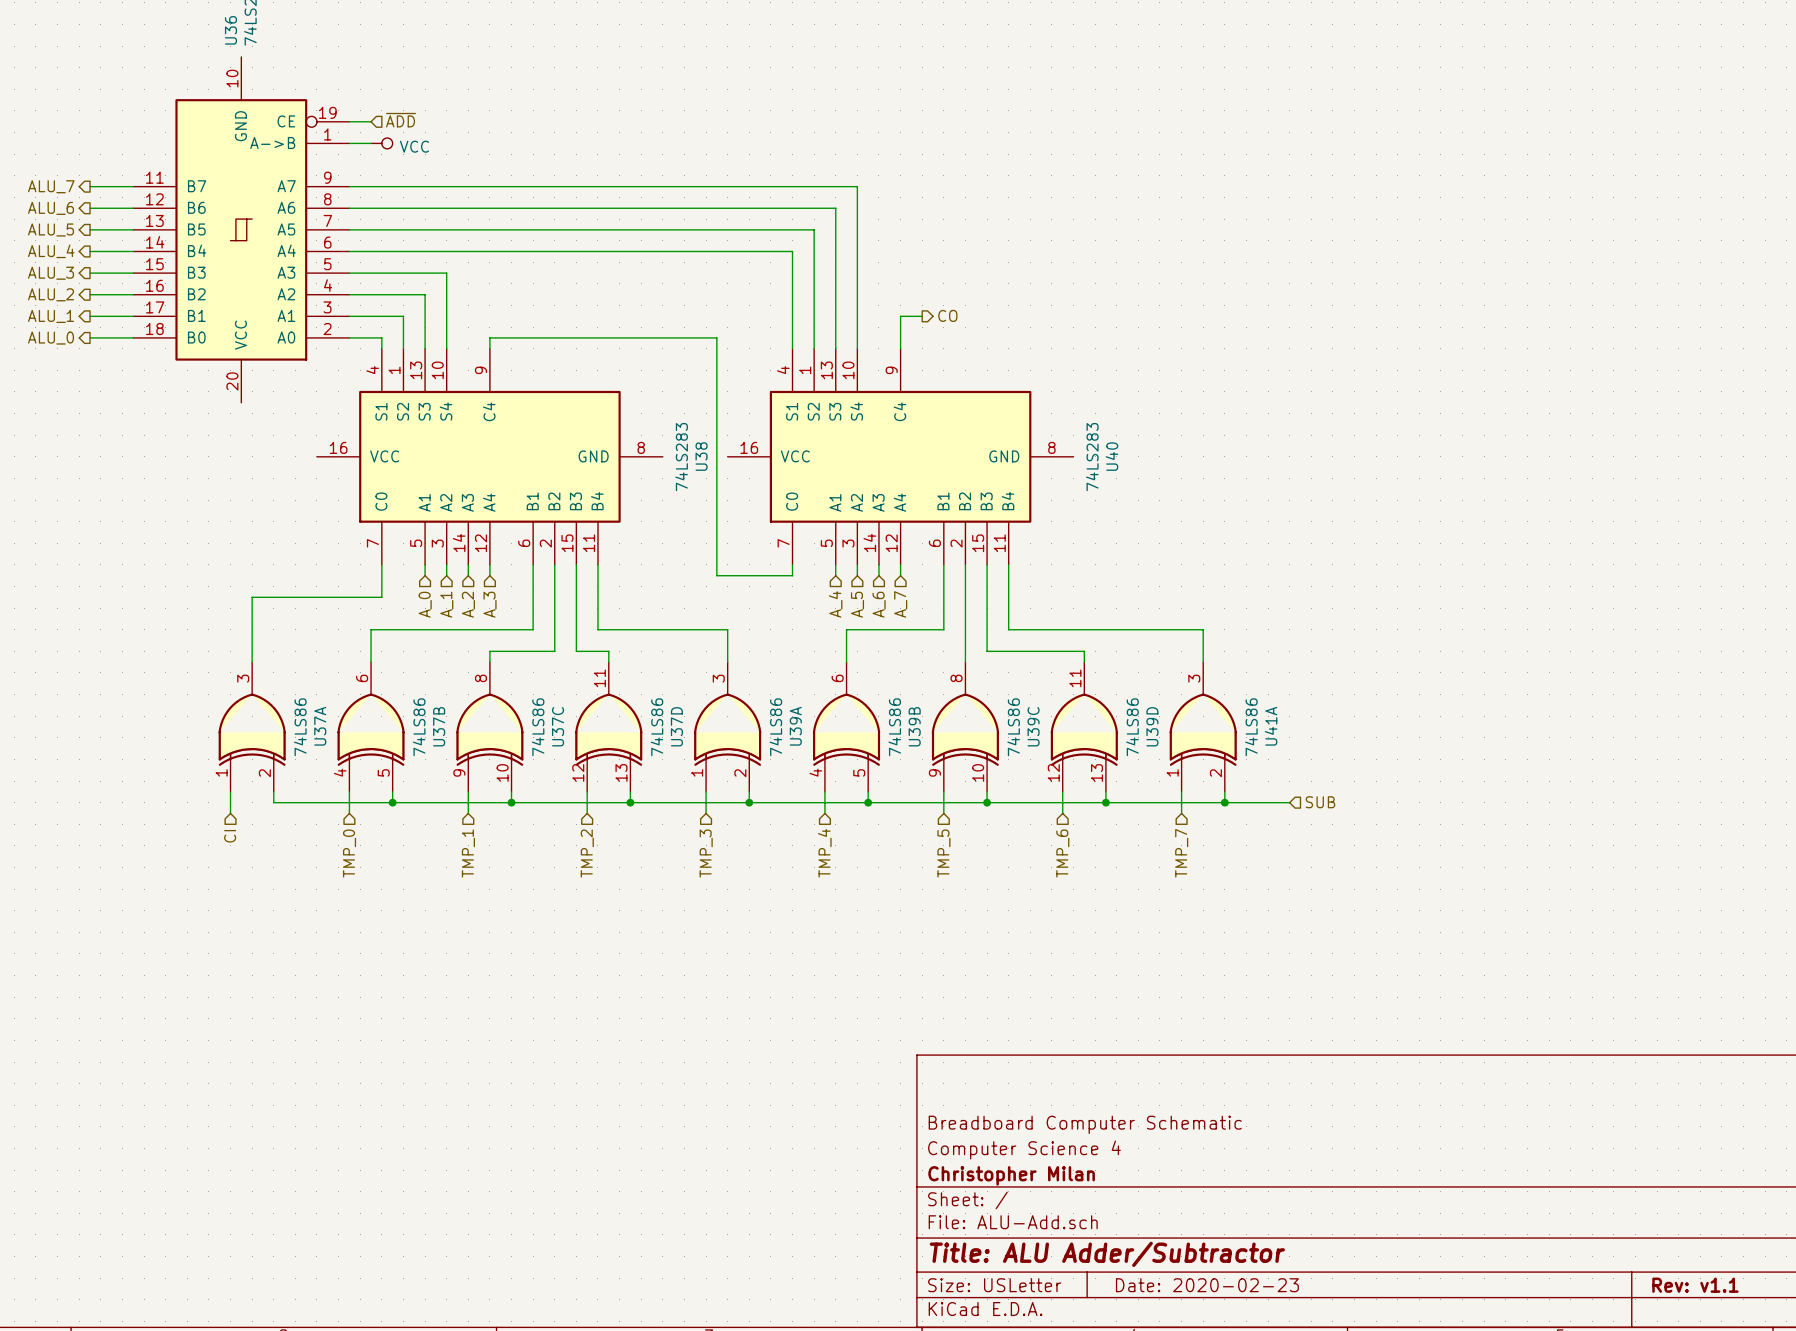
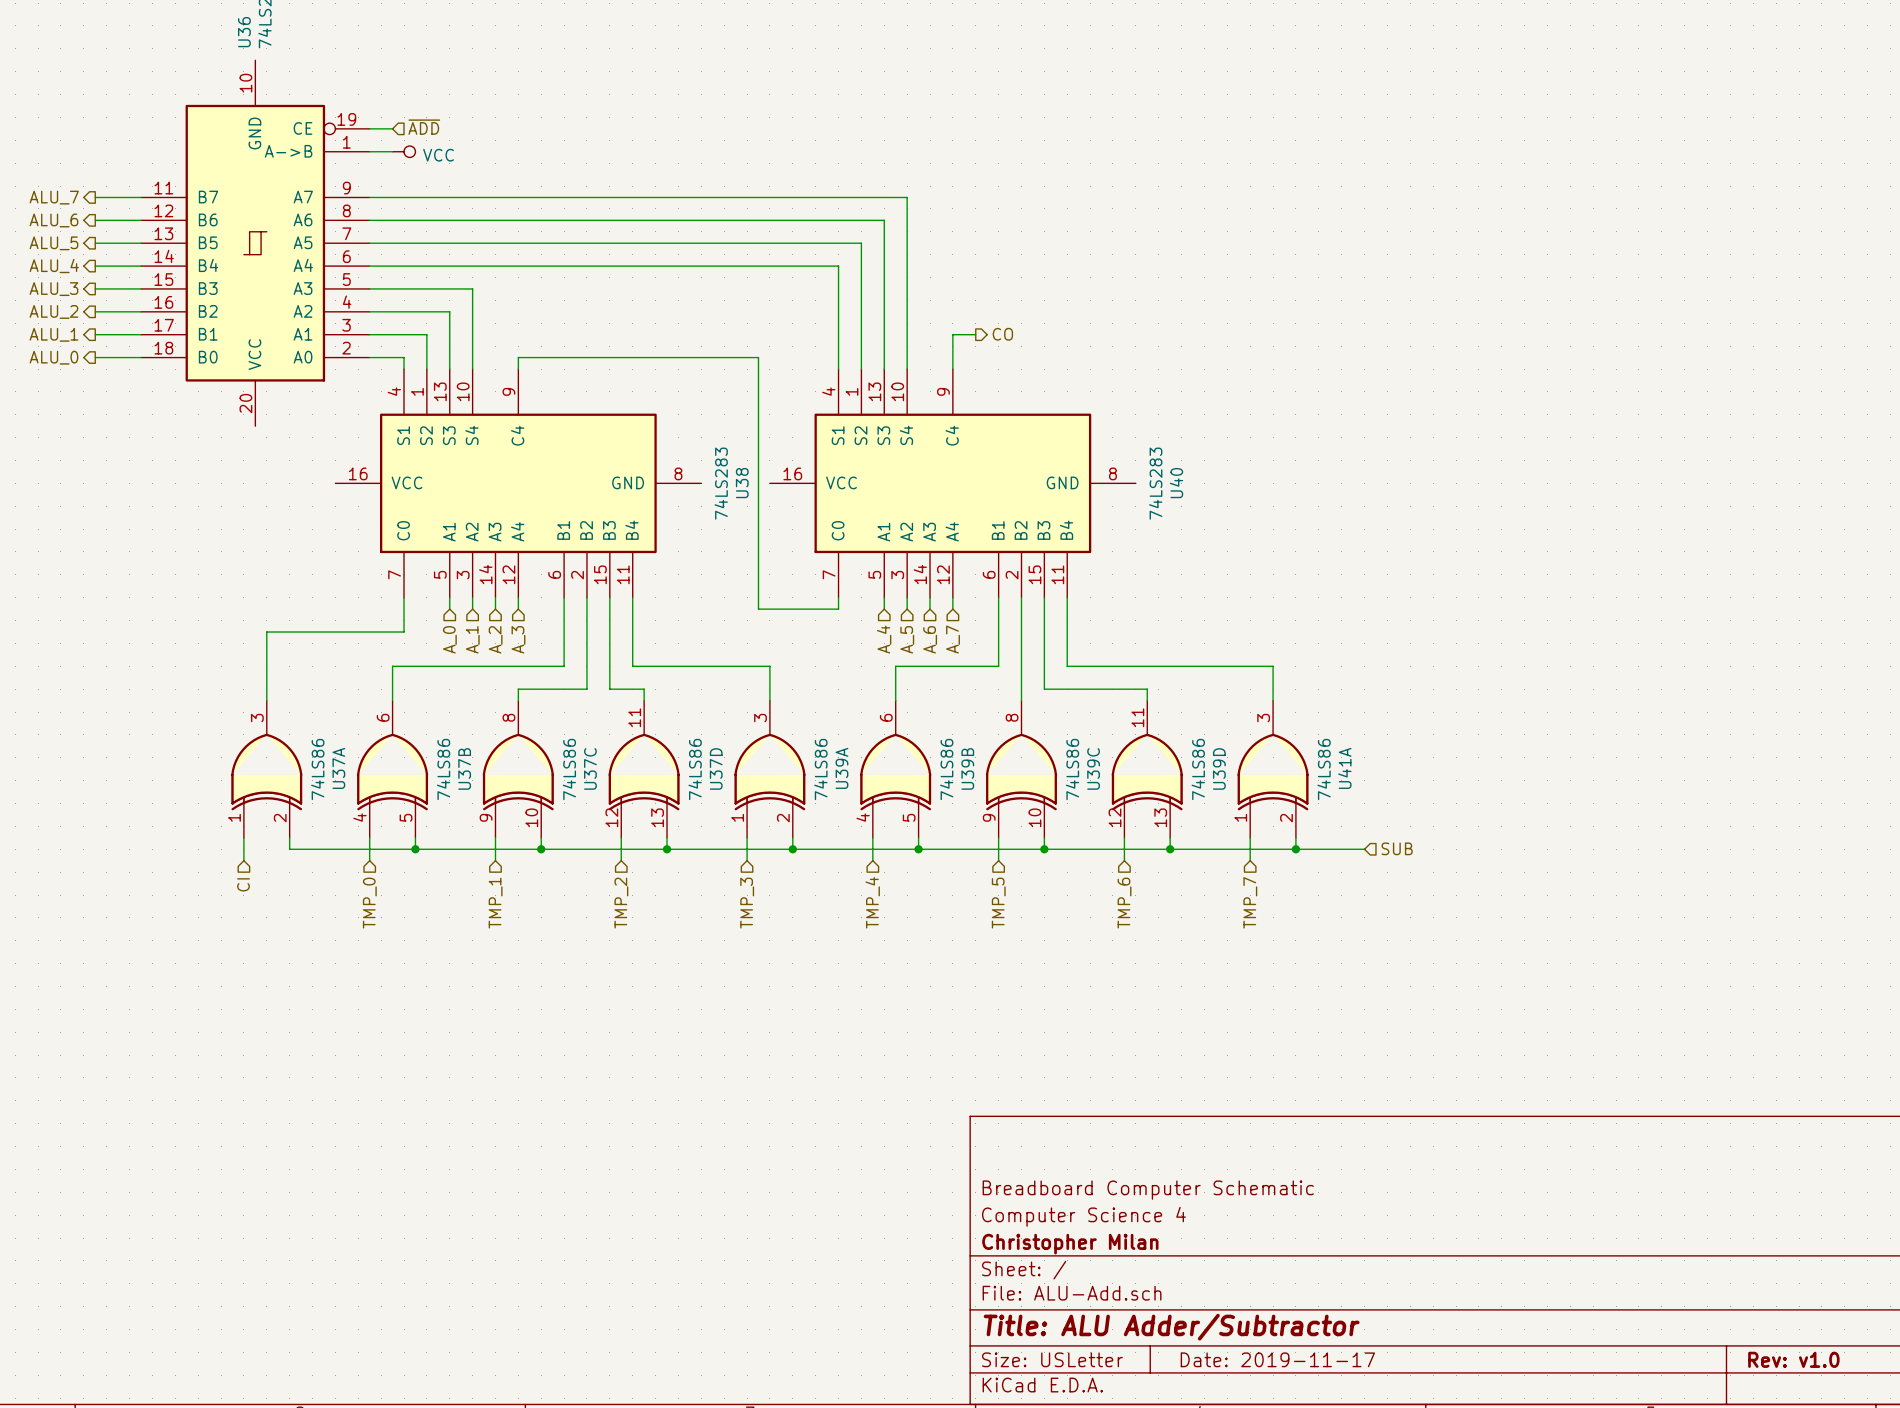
title block: Date: 2020-02-23 (1207, 1285) -> Date: 2019-11-17 (1277, 1359)
title block: Rev: v1.1 (1695, 1285) -> Rev: v1.0 (1793, 1359)

